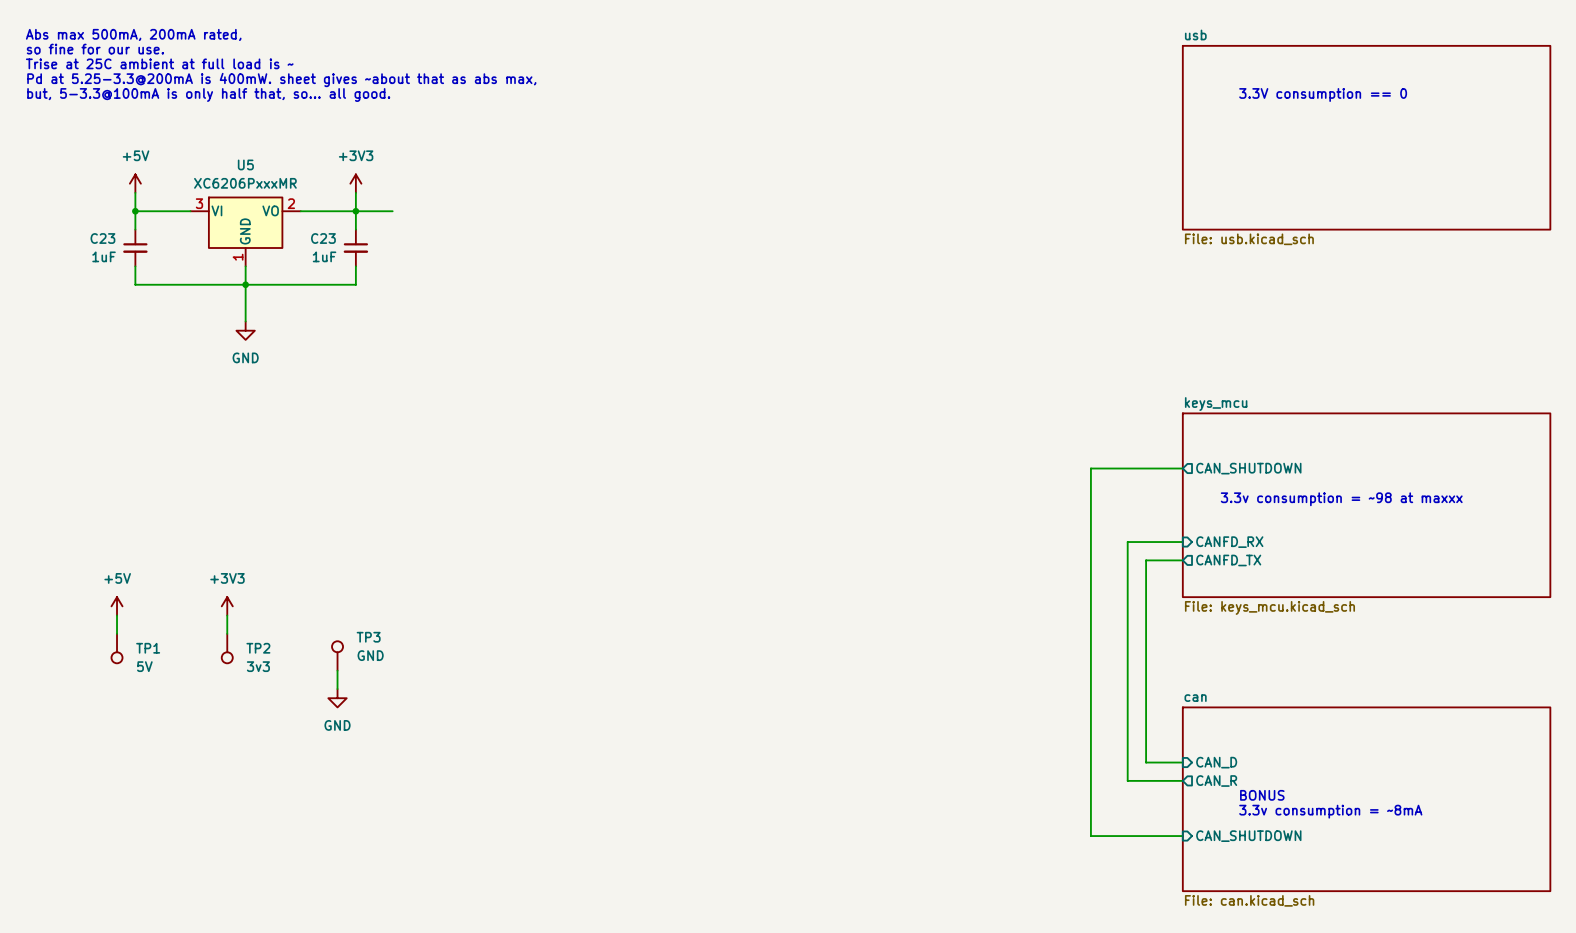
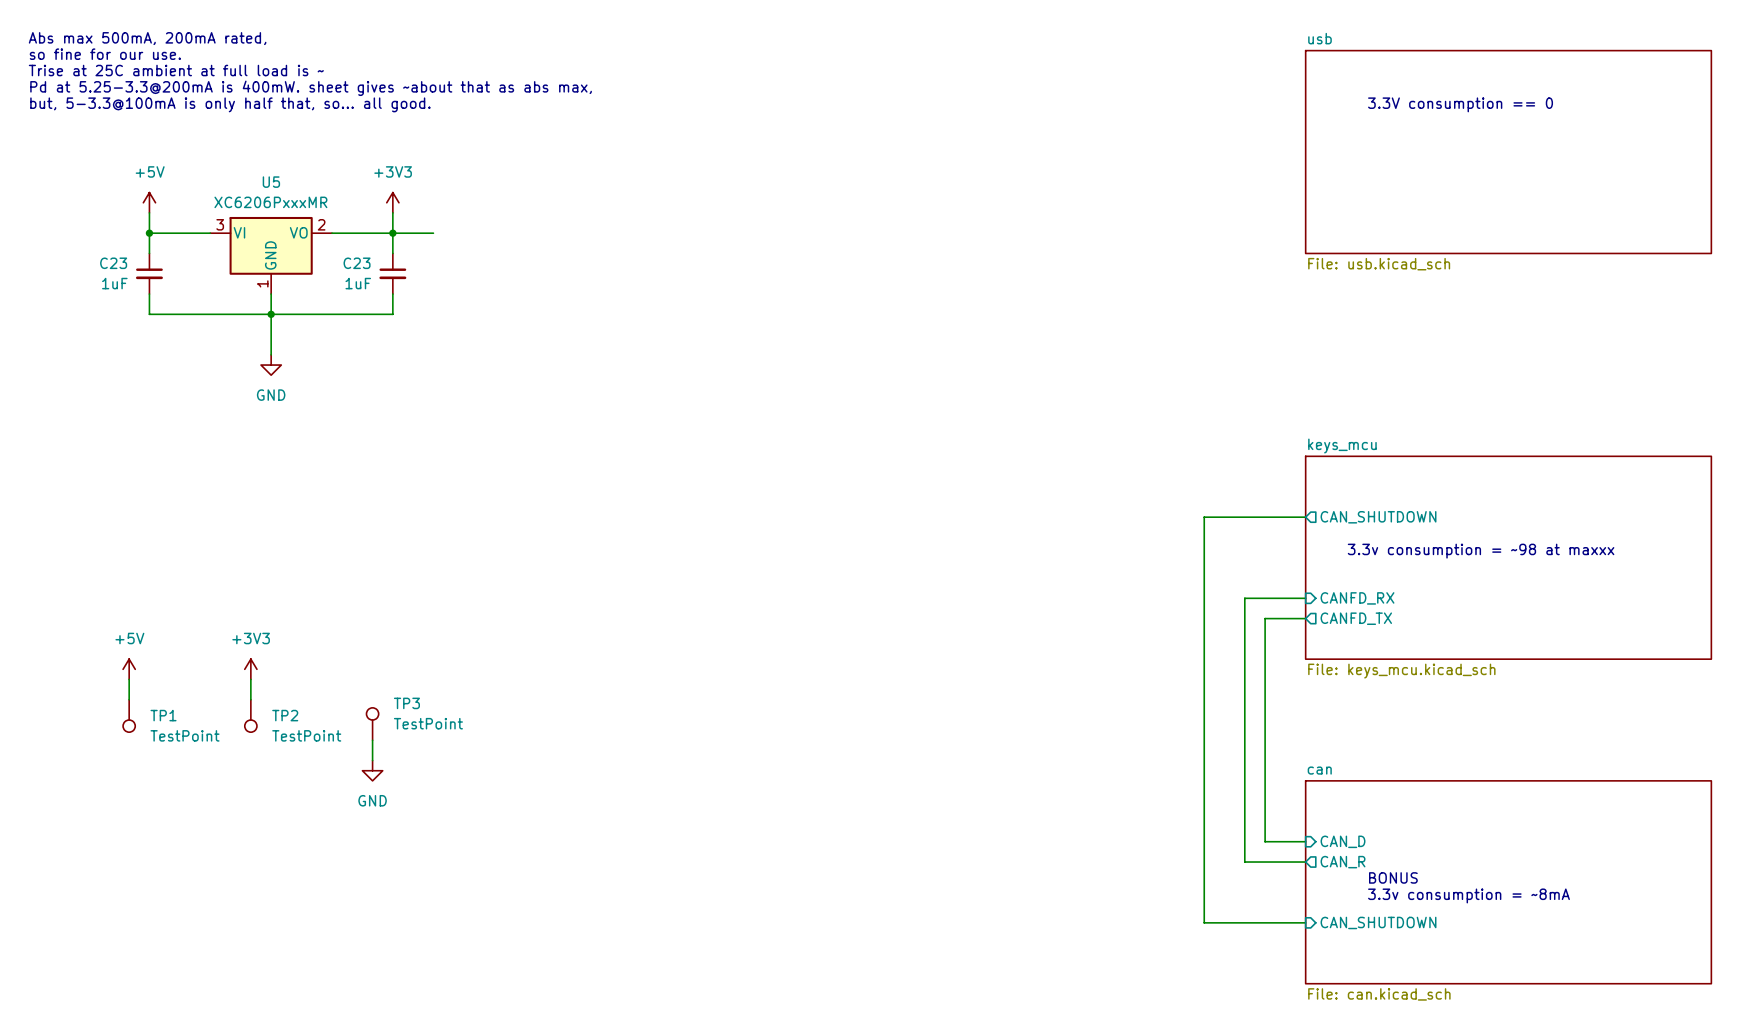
TP3 value: GND (370, 655) -> TestPoint (428, 723)
TP1 value: 5V (144, 666) -> TestPoint (185, 735)
TP2 value: 3v3 (258, 666) -> TestPoint (306, 735)

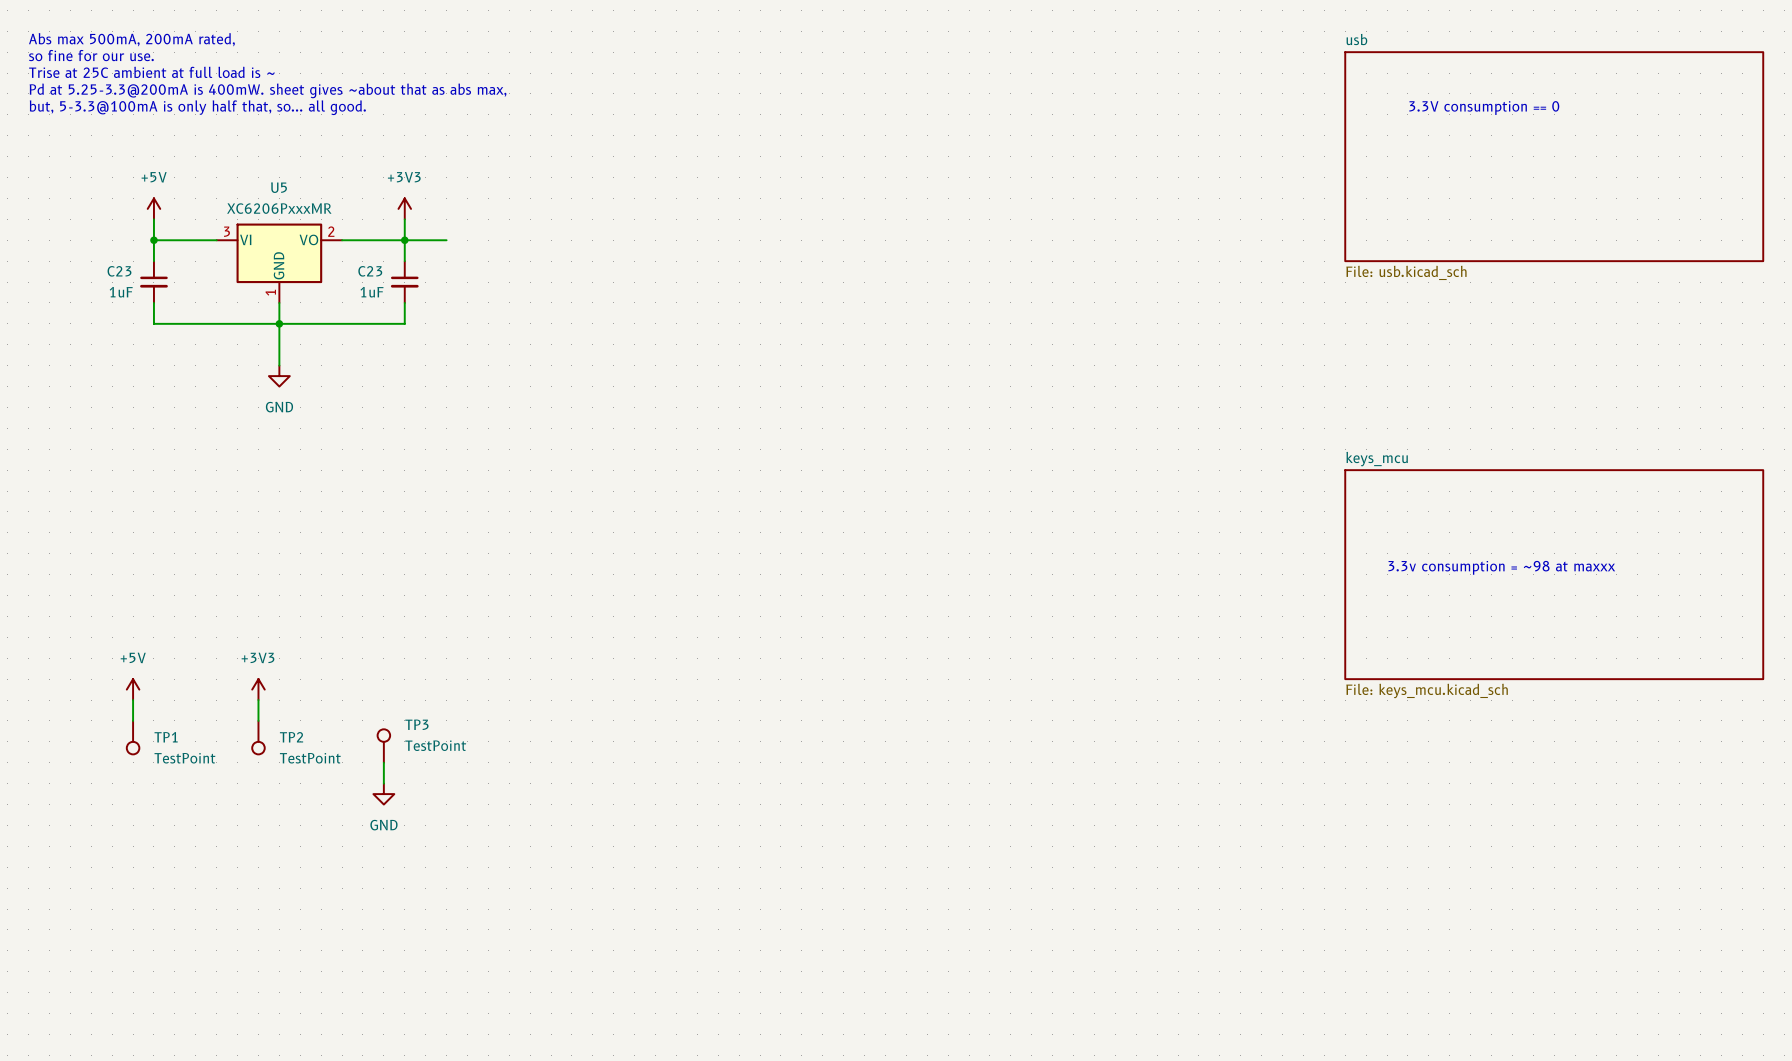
wire: (1305, 517) (1204, 517) (1204, 922) (1305, 922) -> none
sheet pin: CAN_SHUTDOWN (1378, 517) -> none
wire: (1305, 598) (1244, 598) (1244, 862) (1305, 862) -> none
sheet pin: CANFD_RX (1357, 598) -> none
wire: (1305, 618) (1265, 618) (1265, 841) (1305, 841) -> none
sheet pin: CANFD_TX (1356, 618) -> none
sheet pin: CAN_D (1343, 841) -> none
sheet pin: CAN_R (1343, 862) -> none
text: BONUS (1393, 877) -> none
sheet can: File: can.kicad_sch (1508, 882) -> none
text: 3.3v consumption = ~8mA (1468, 895) -> none
sheet pin: CAN_SHUTDOWN (1378, 922) -> none

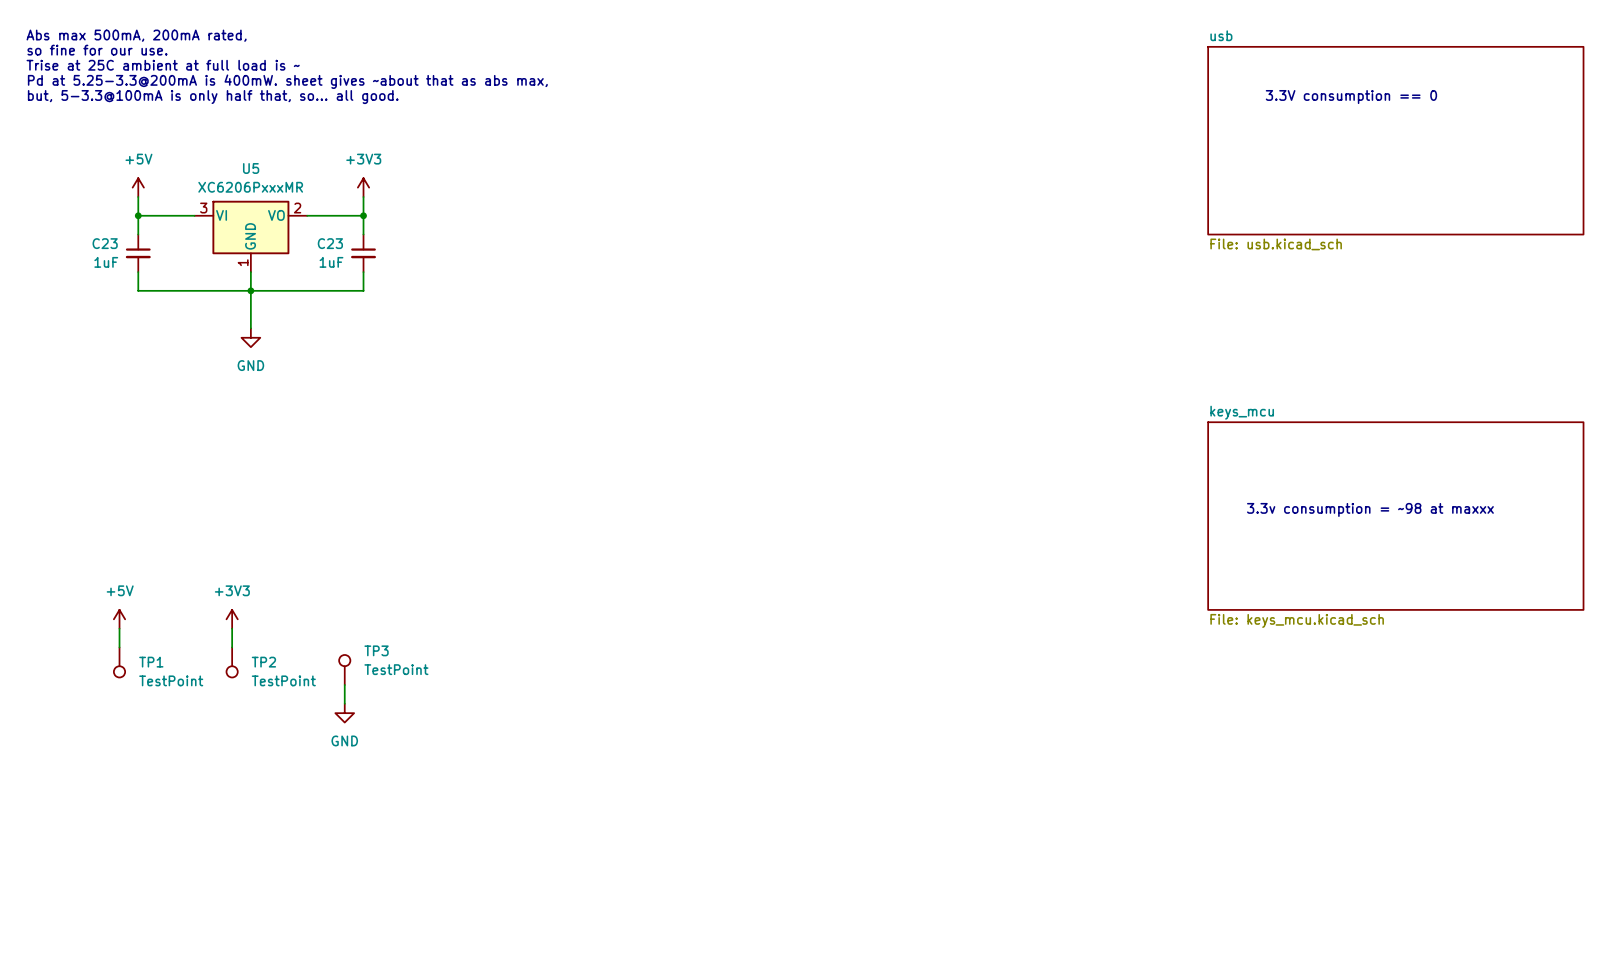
wire: (404, 240) (446, 240) -> none

